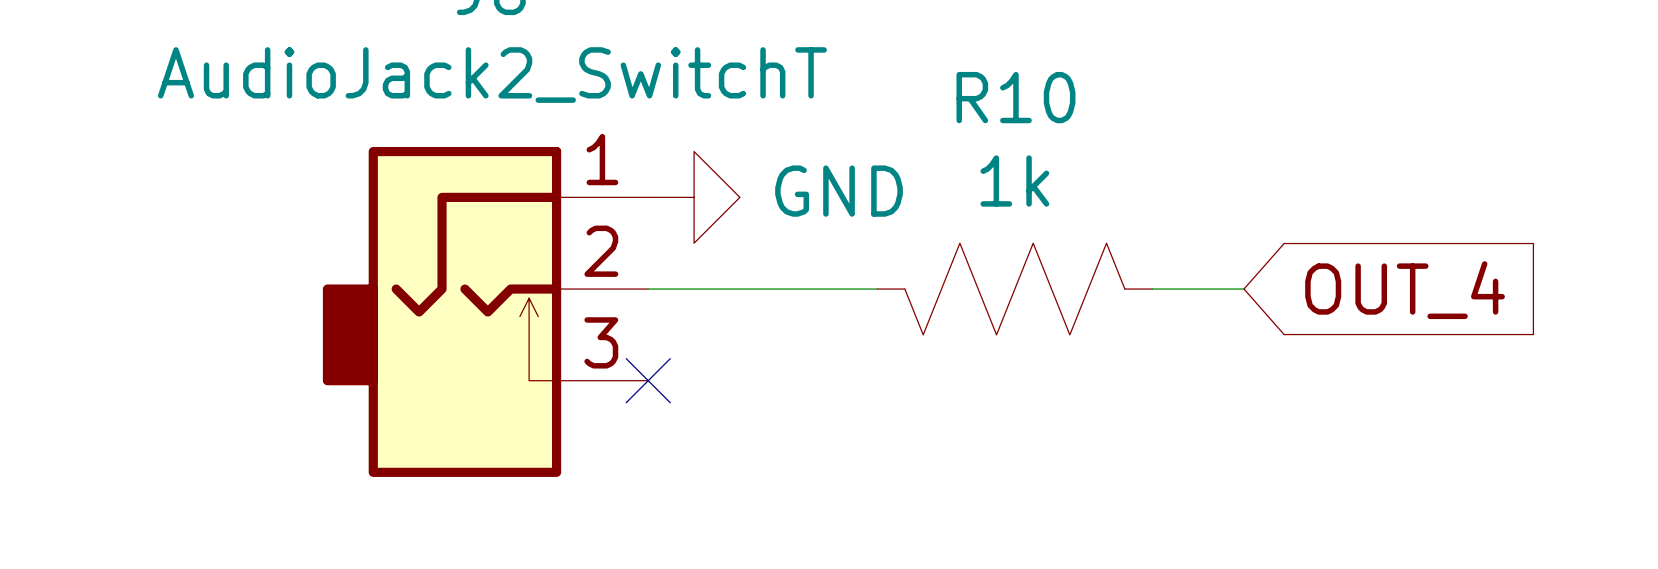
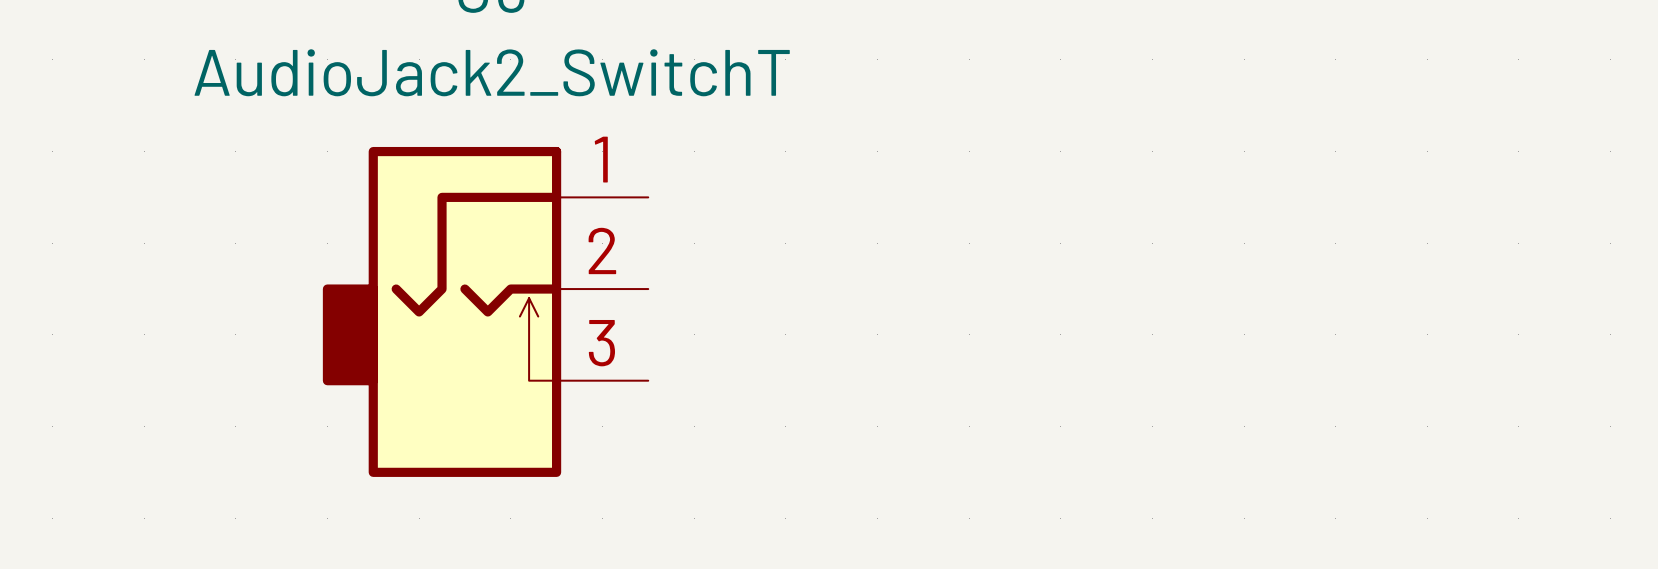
power symbol: GND (694, 197) -> none
wire: (648, 289) (877, 289) -> none
R10: 1k (1014, 289) -> none
wire: (1152, 289) (1244, 289) -> none
global label: OUT_4 (1405, 290) -> none
no-connect mark: (648, 380) -> none

